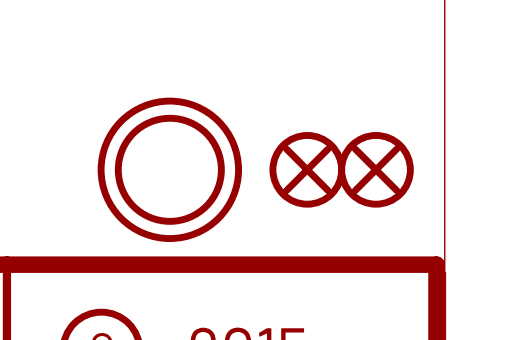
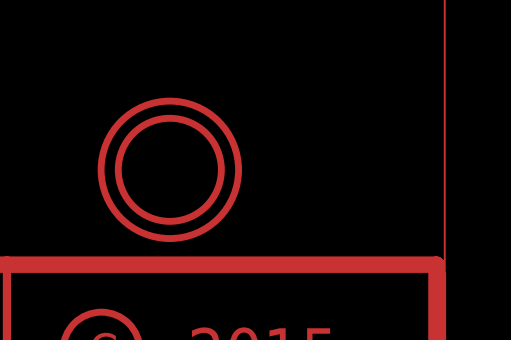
part: (307, 169) -> none
part: (376, 169) -> none

